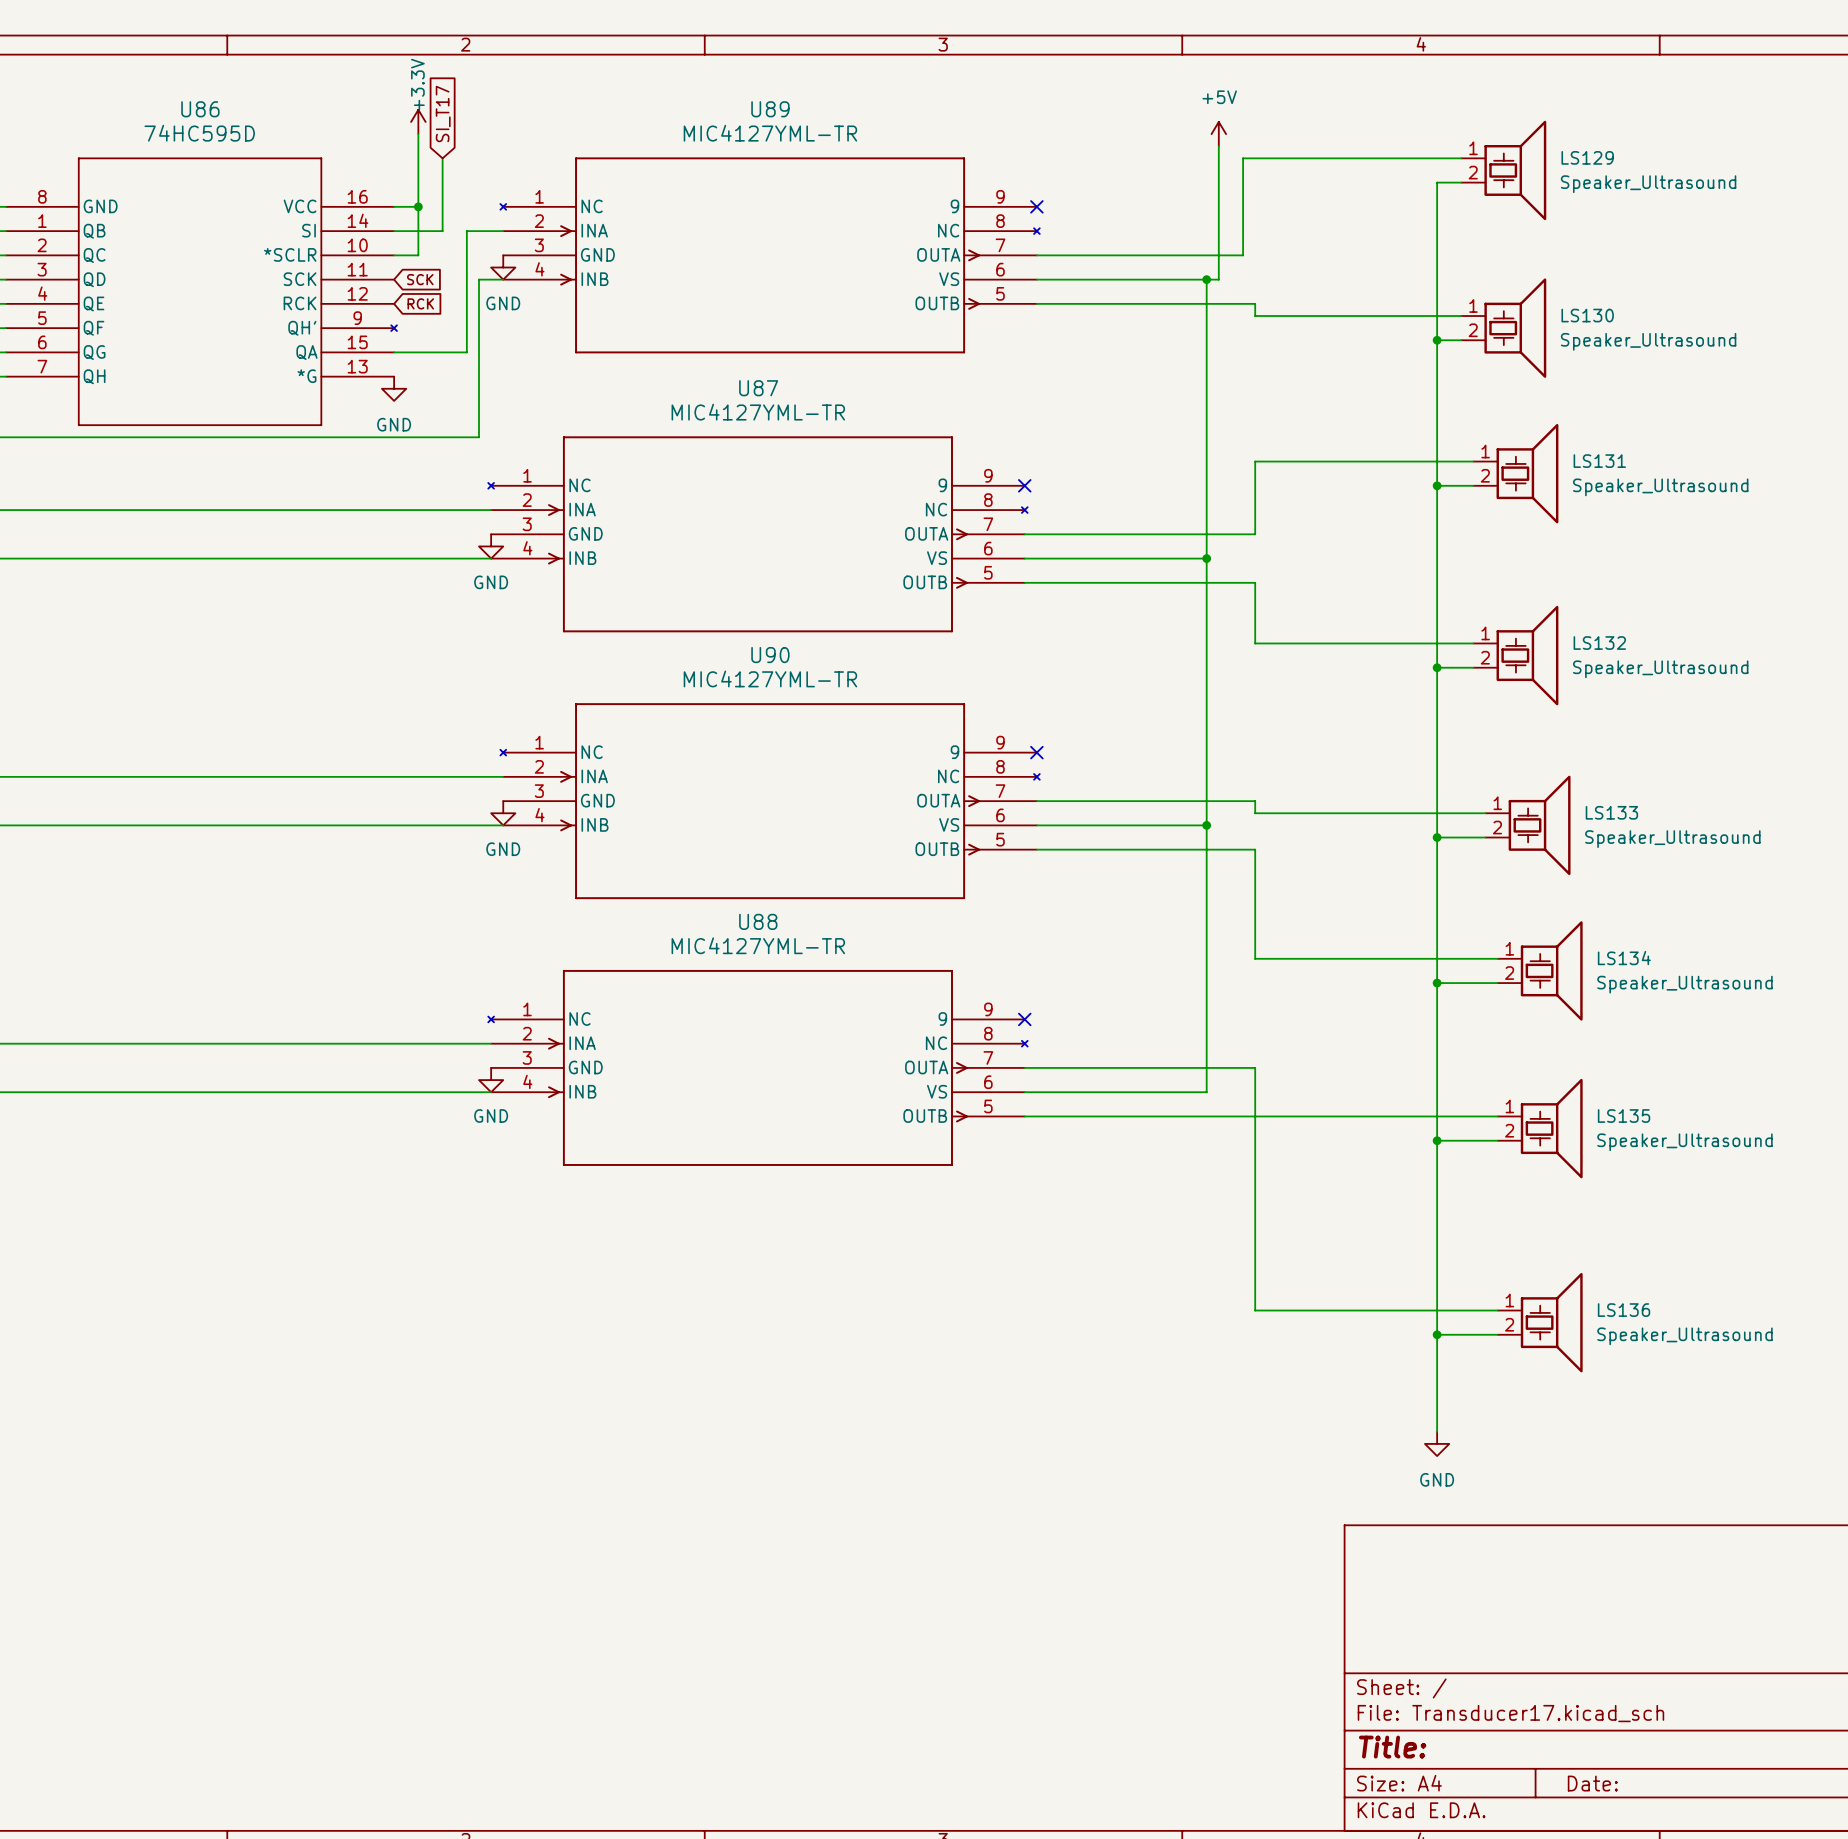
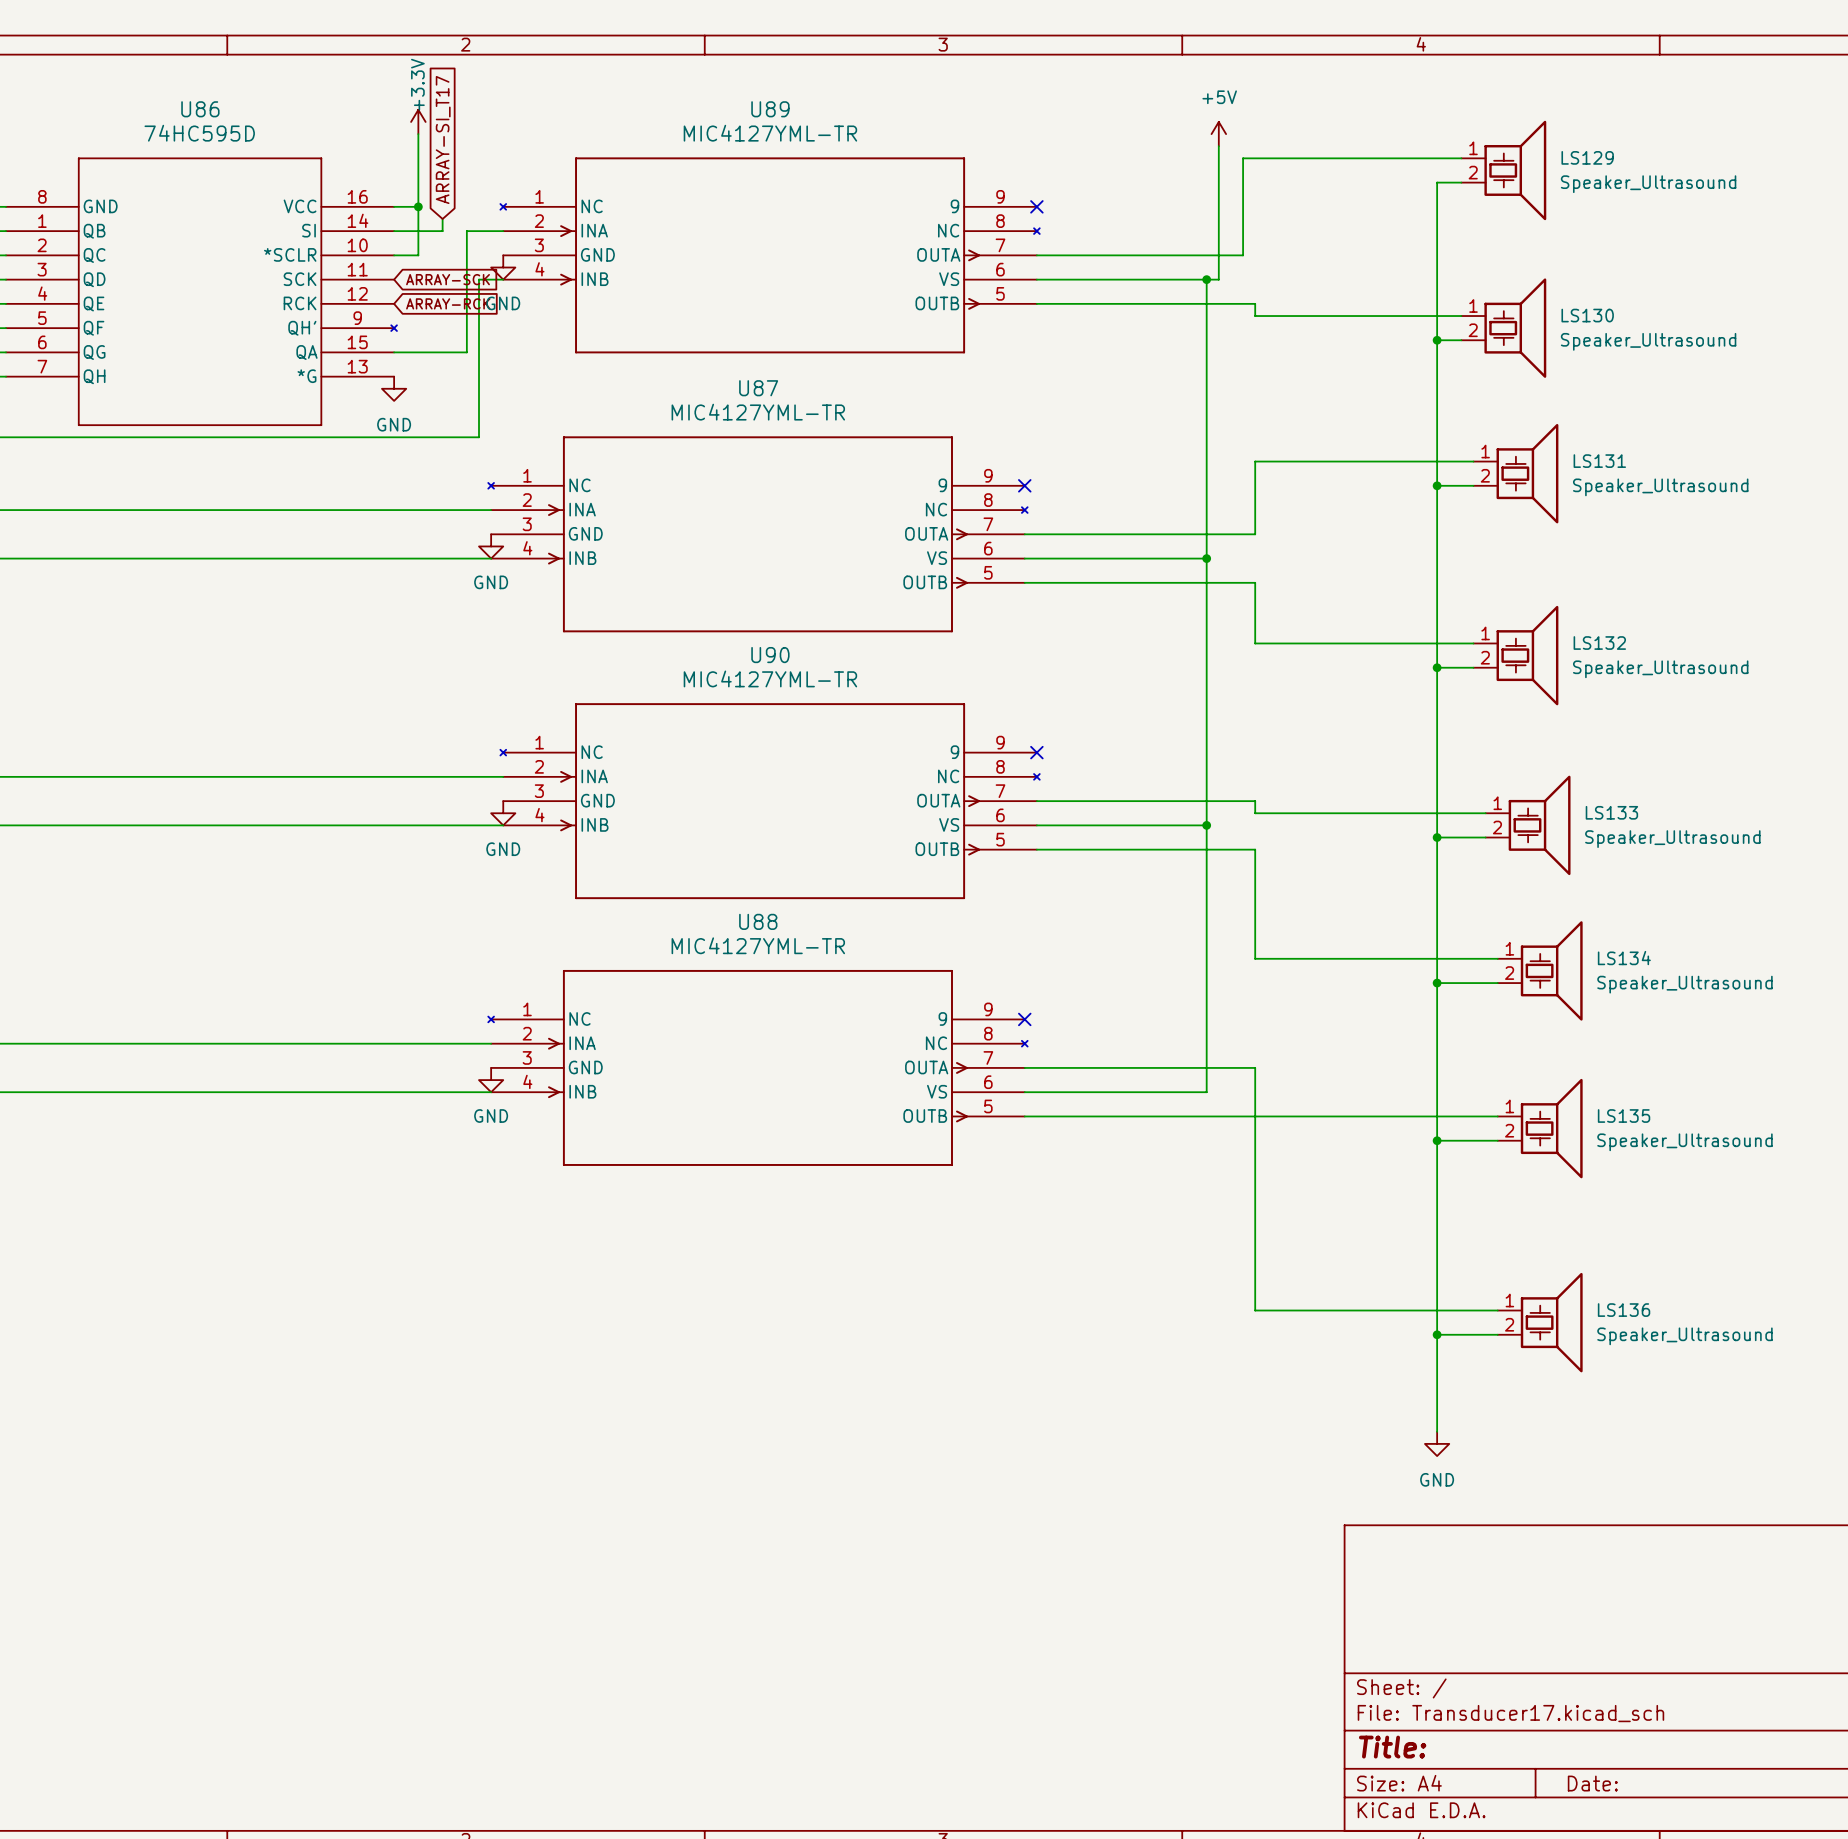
global label: SI_T17 (443, 114) -> ARRAY-SI_T17 (443, 139)
wire: (442, 158) (442, 218) -> none
global label: SCK (420, 279) -> ARRAY-SCK (448, 279)
global label: RCK (420, 303) -> ARRAY-RCK (448, 303)

